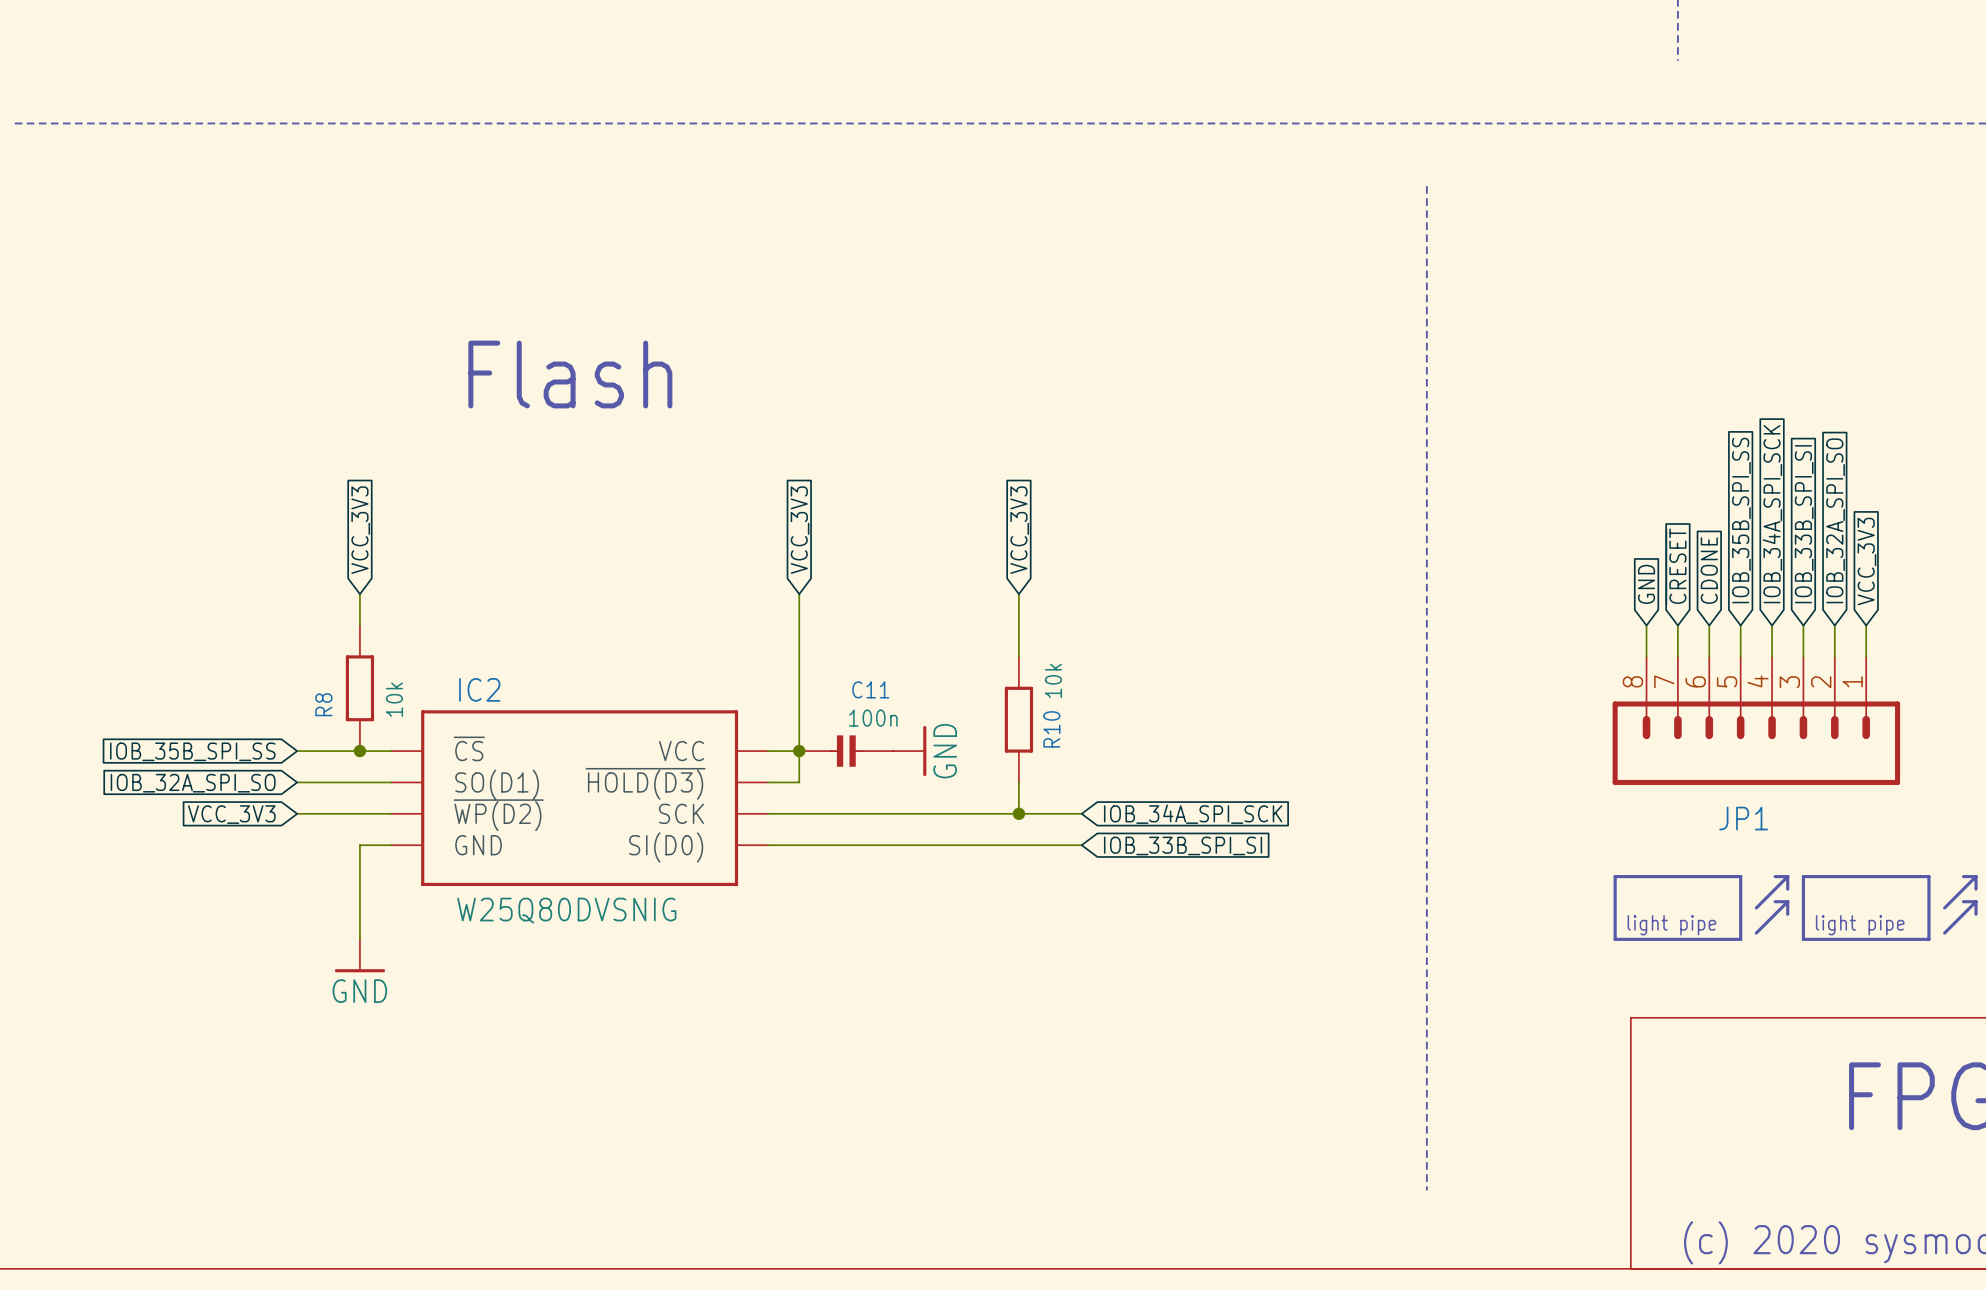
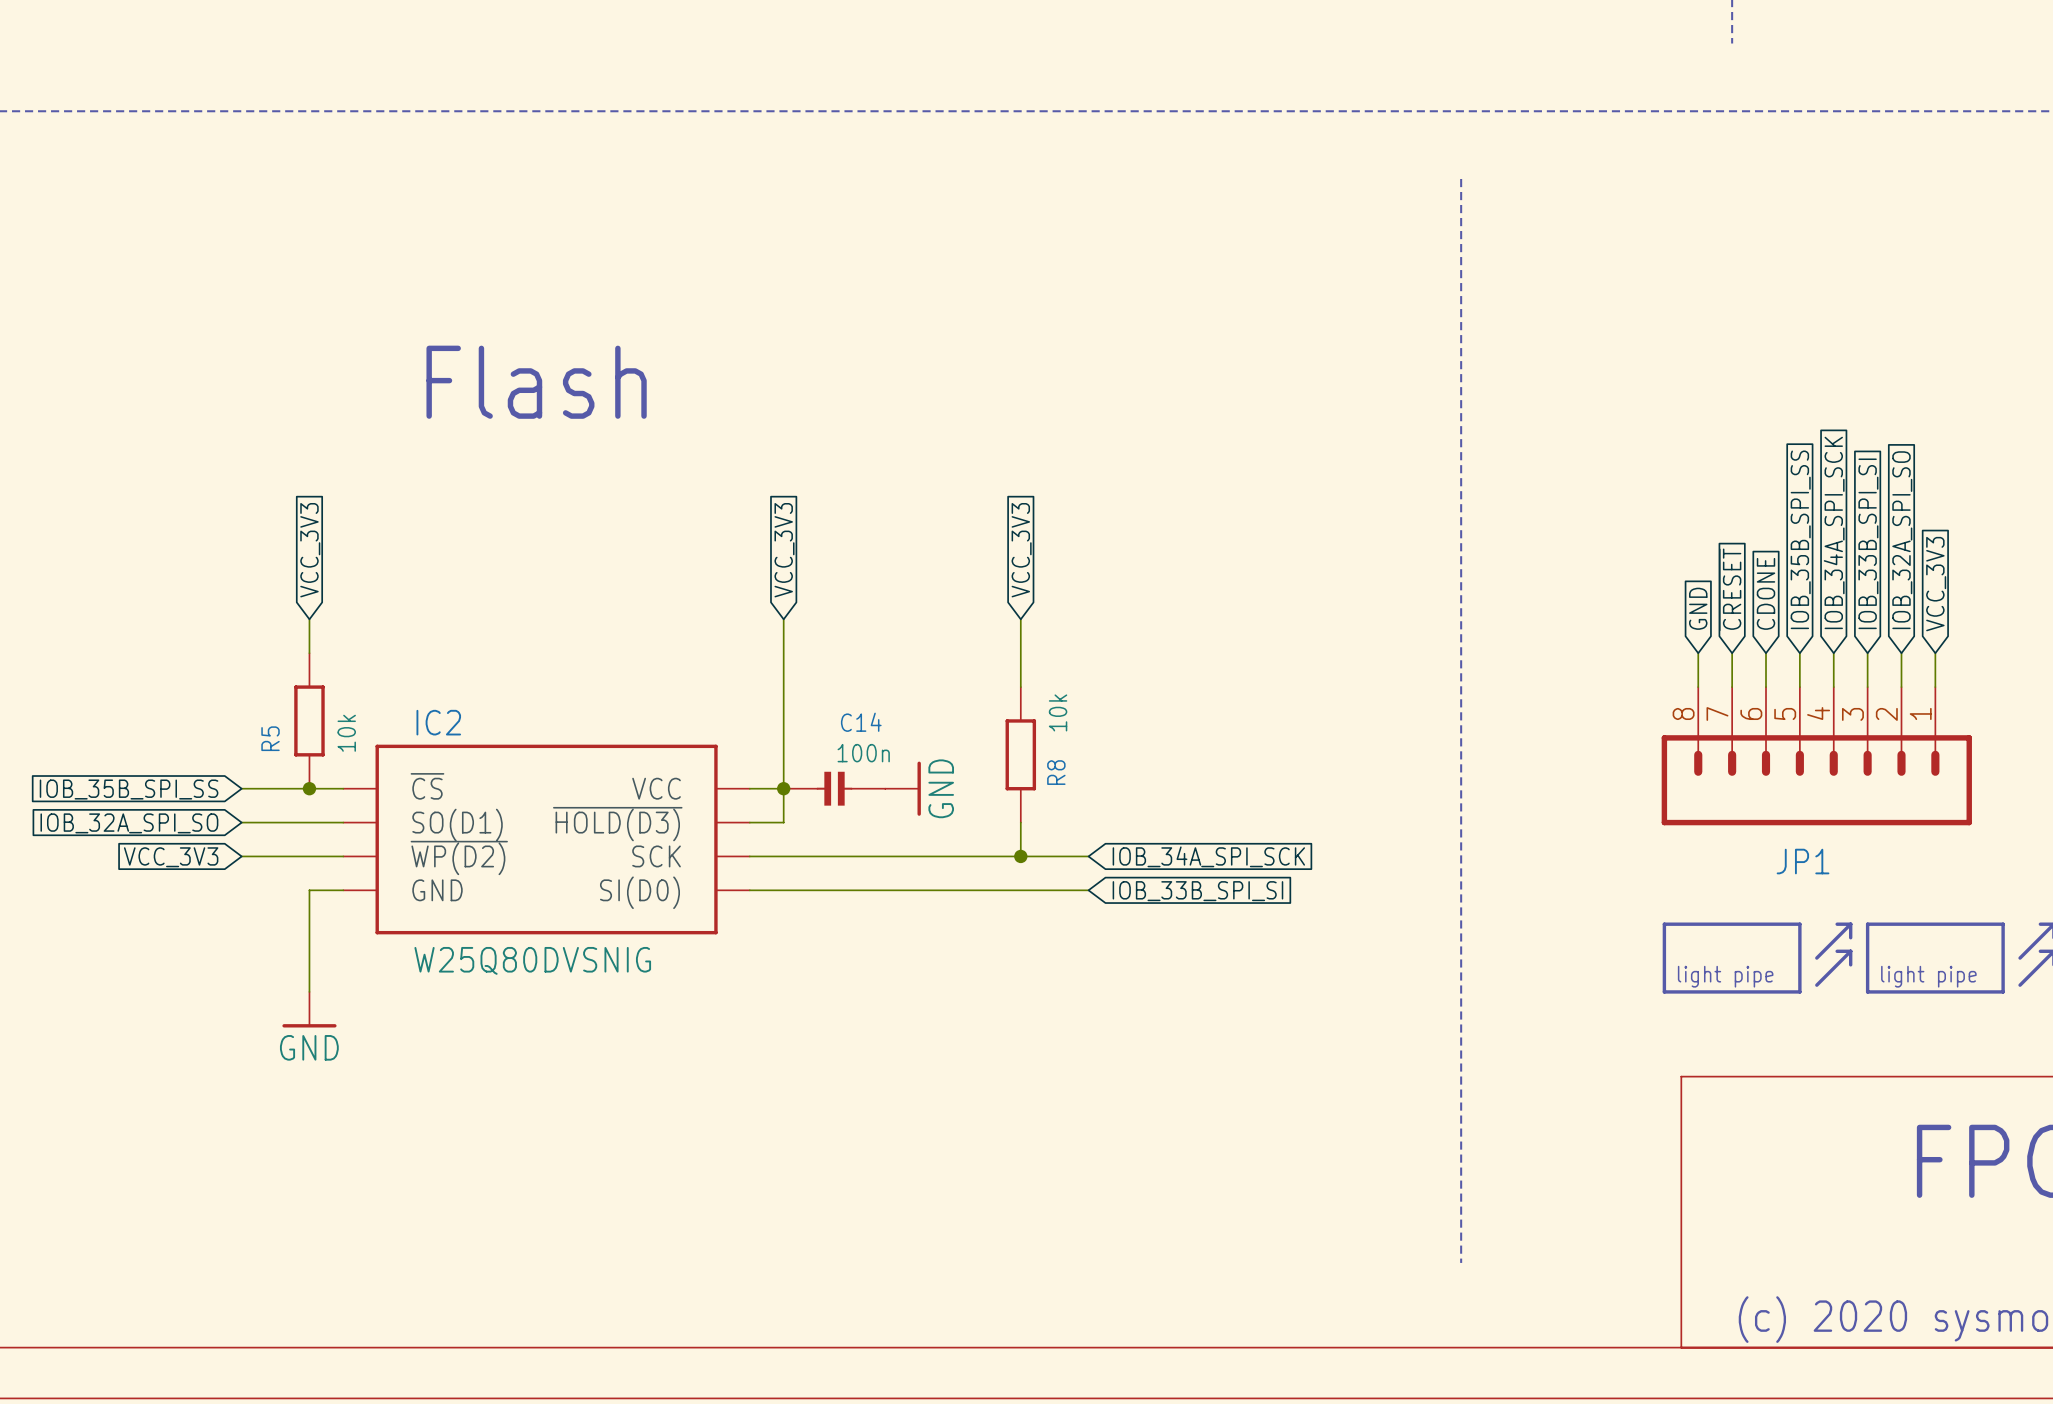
C11 name: C11 (870, 689) -> C14 (861, 722)
R8 name: R8 (323, 704) -> R5 (270, 738)
R10 name: R10 (1051, 729) -> R8 (1056, 772)

